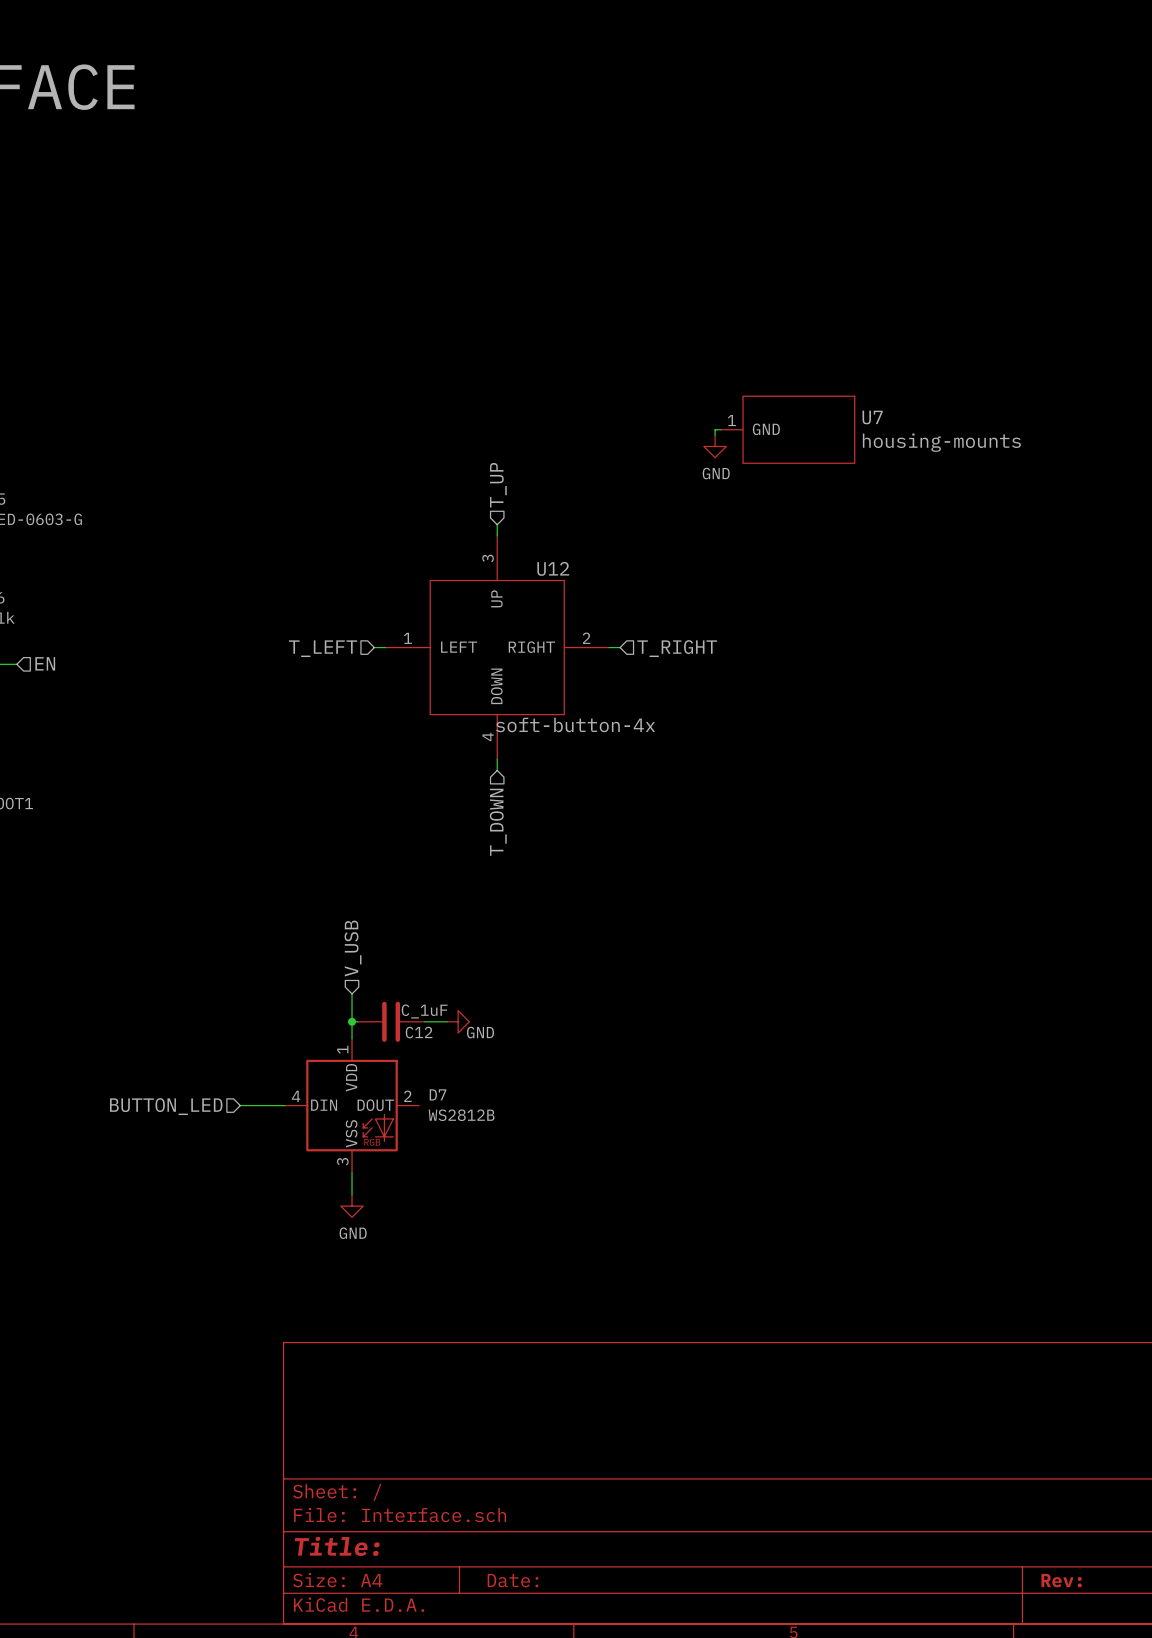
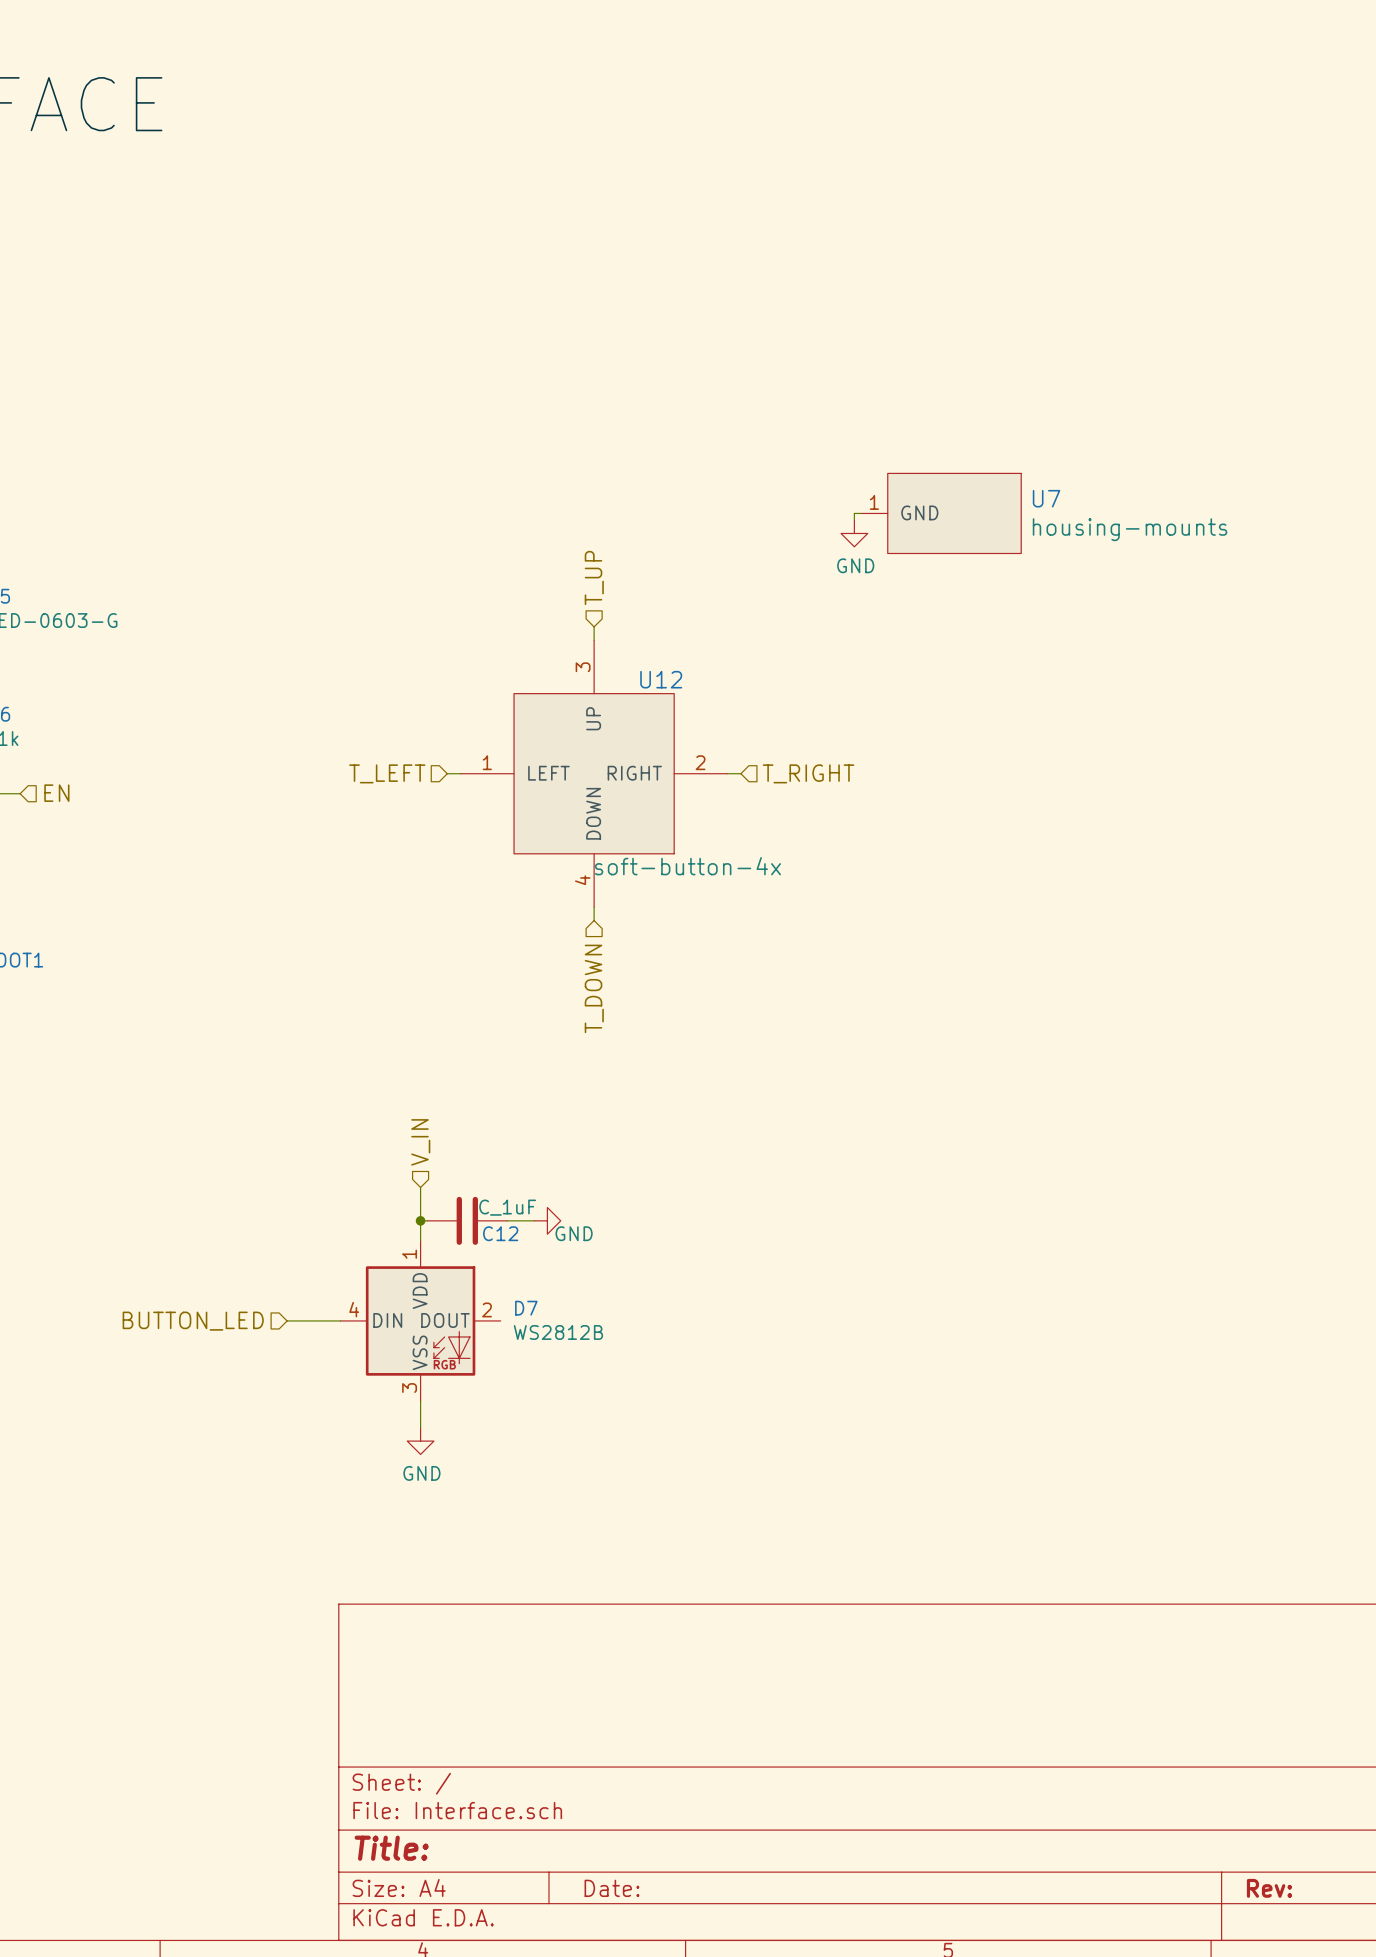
hierarchical label: V_USB (353, 948) -> V_IN (420, 1142)

